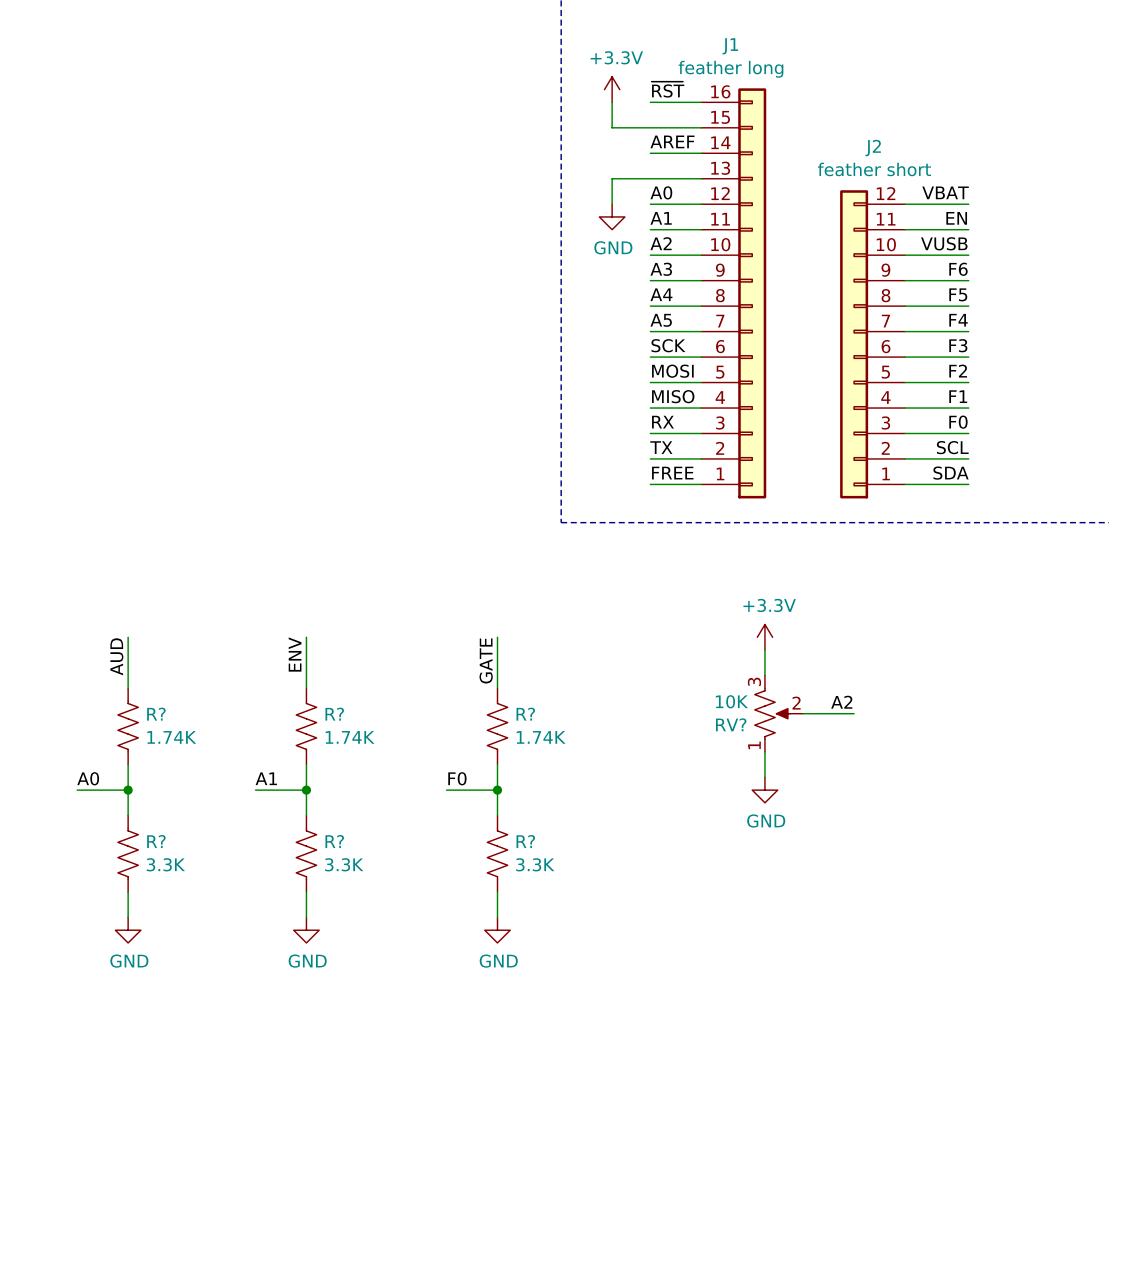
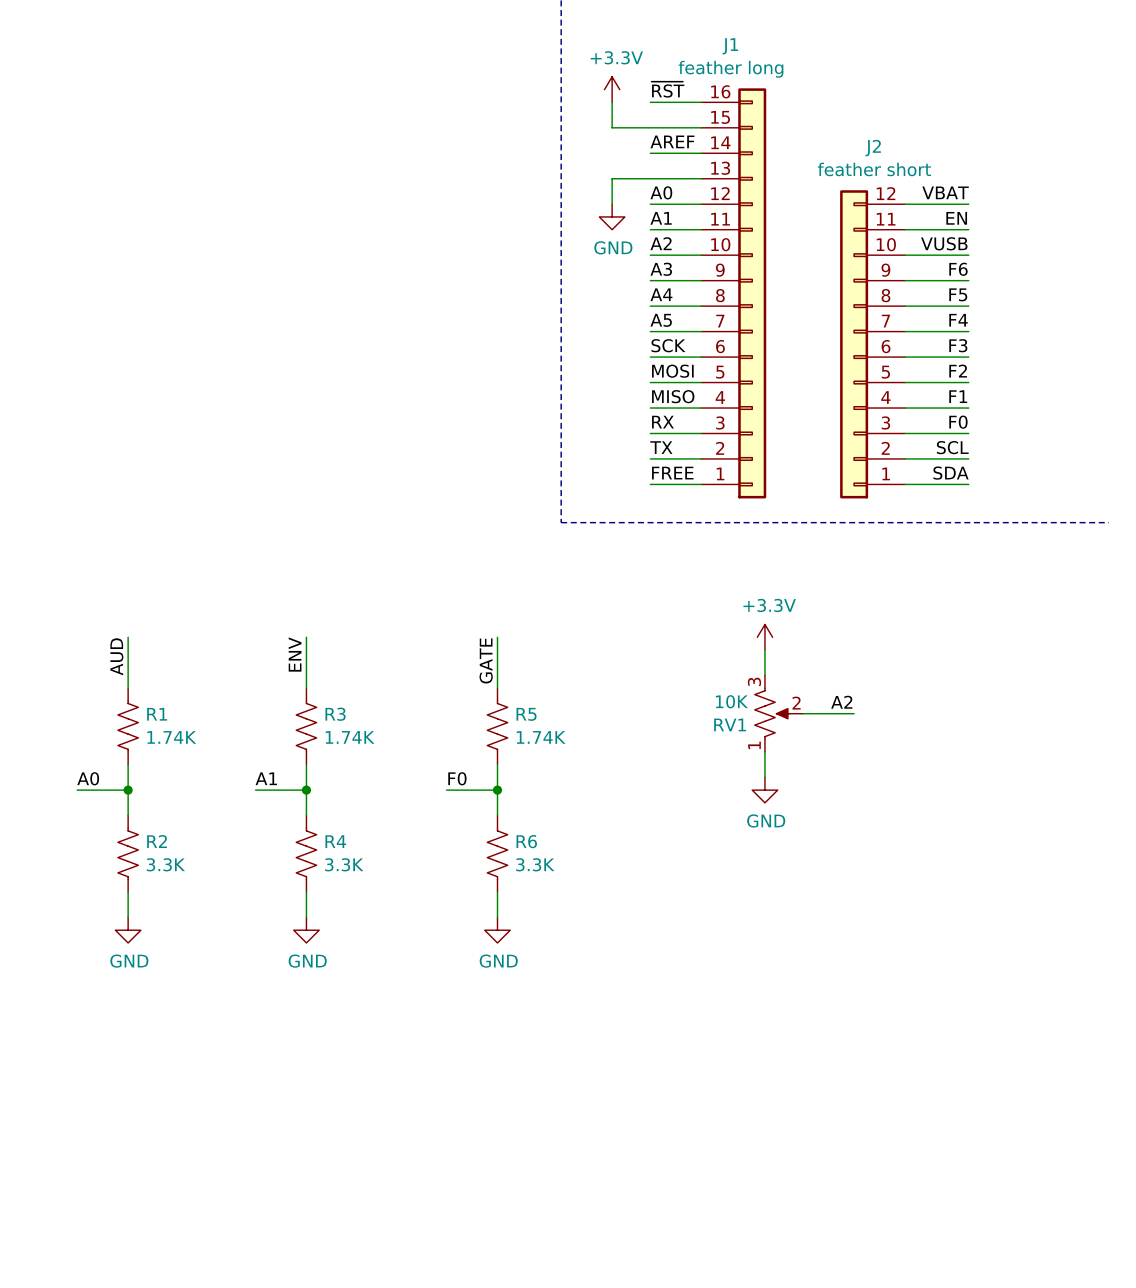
R? name: R? (156, 714) -> R1 (157, 714)
R? name: R? (334, 714) -> R3 (335, 714)
R? name: R? (525, 714) -> R5 (526, 714)
RV? name: RV? (731, 724) -> RV1 (730, 724)
R? name: R? (156, 841) -> R2 (157, 841)
R? name: R? (334, 841) -> R4 (335, 841)
R? name: R? (525, 841) -> R6 (526, 841)

